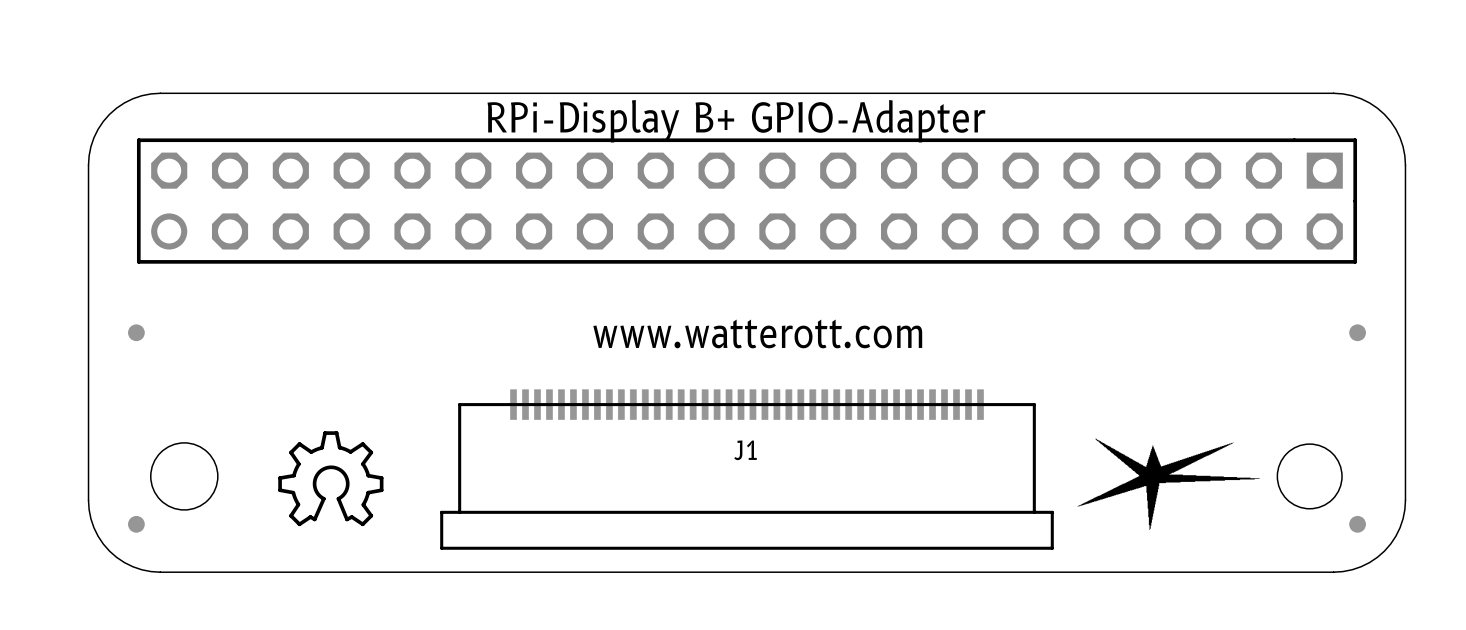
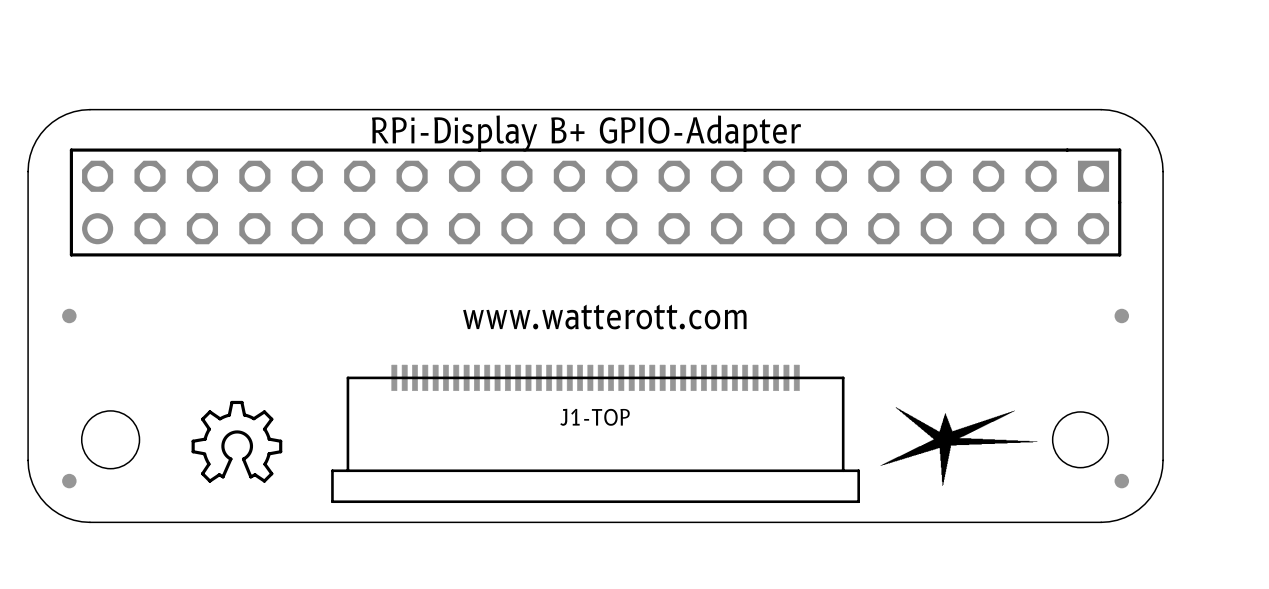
J1 name: J1 (745, 450) -> J1-TOP (595, 417)

